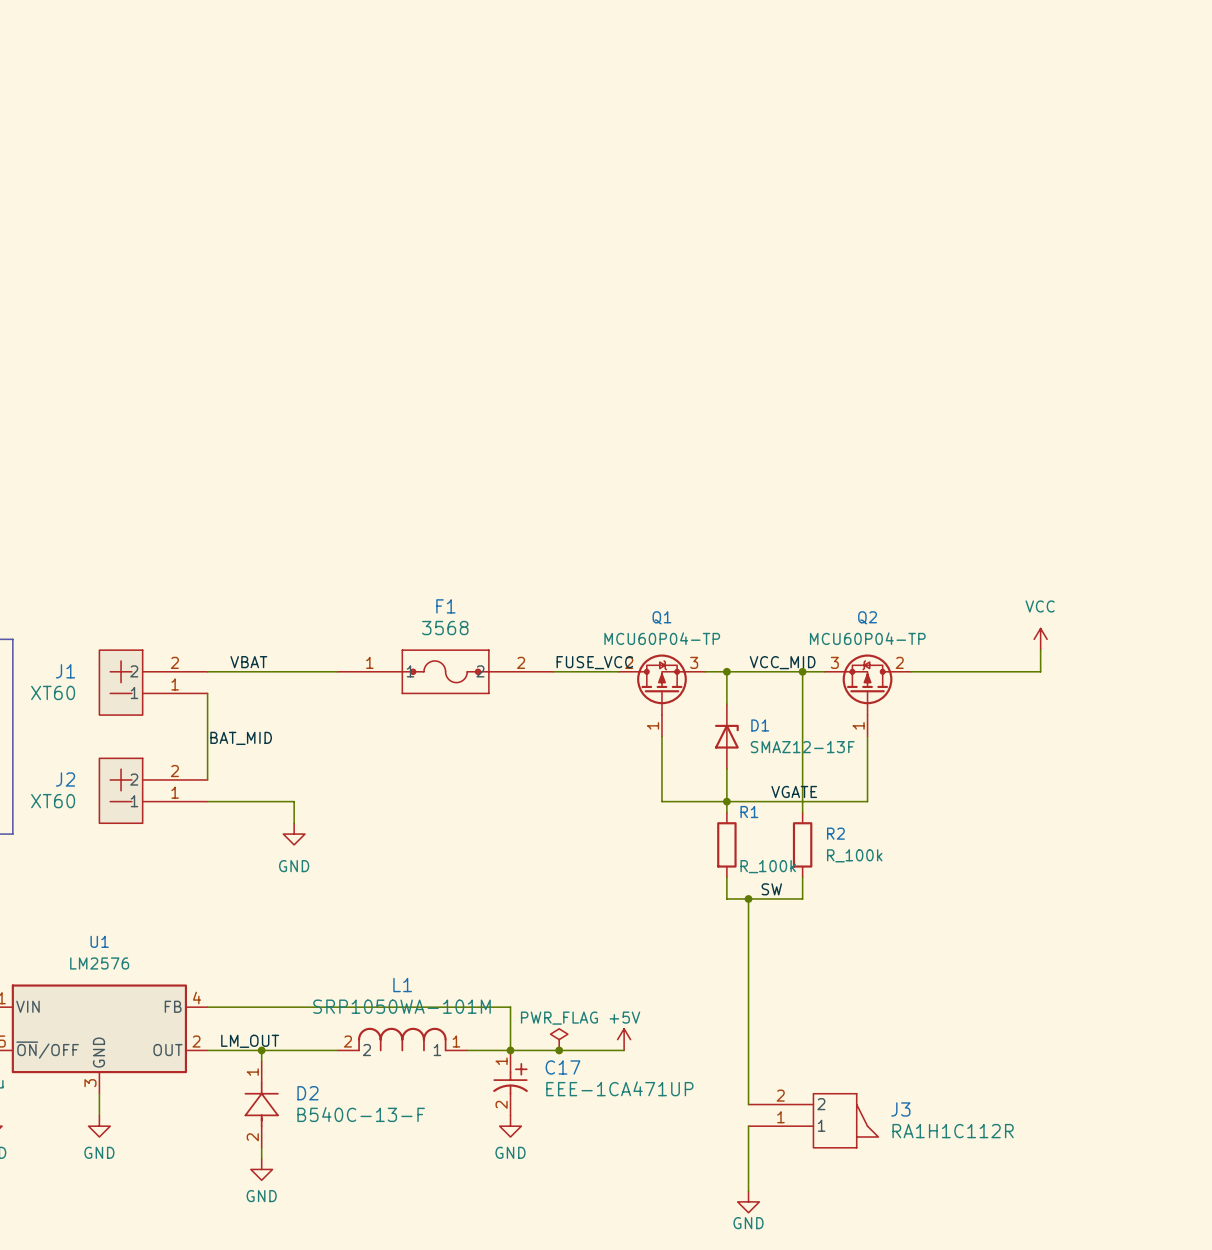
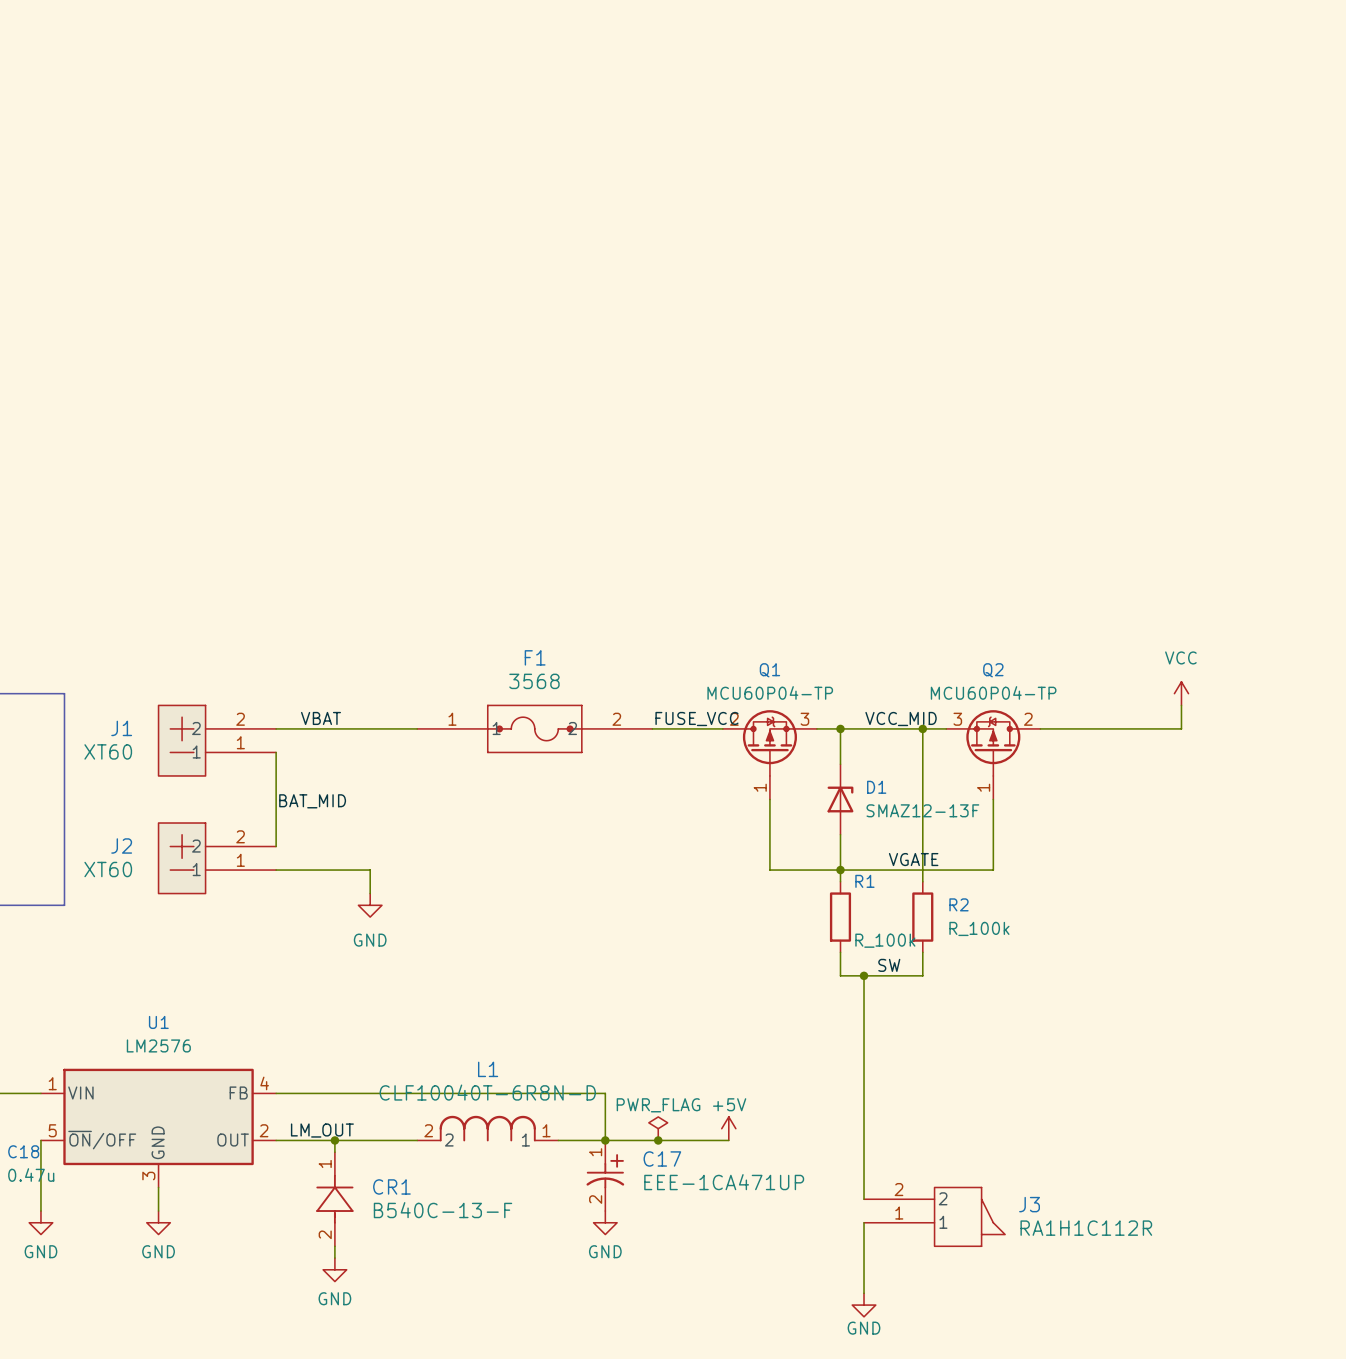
L1 value: SRP1050WA-101M (402, 1006) -> CLF10040T-6R8N-D (487, 1092)
D2 name: D2 (307, 1093) -> CR1 (391, 1186)

